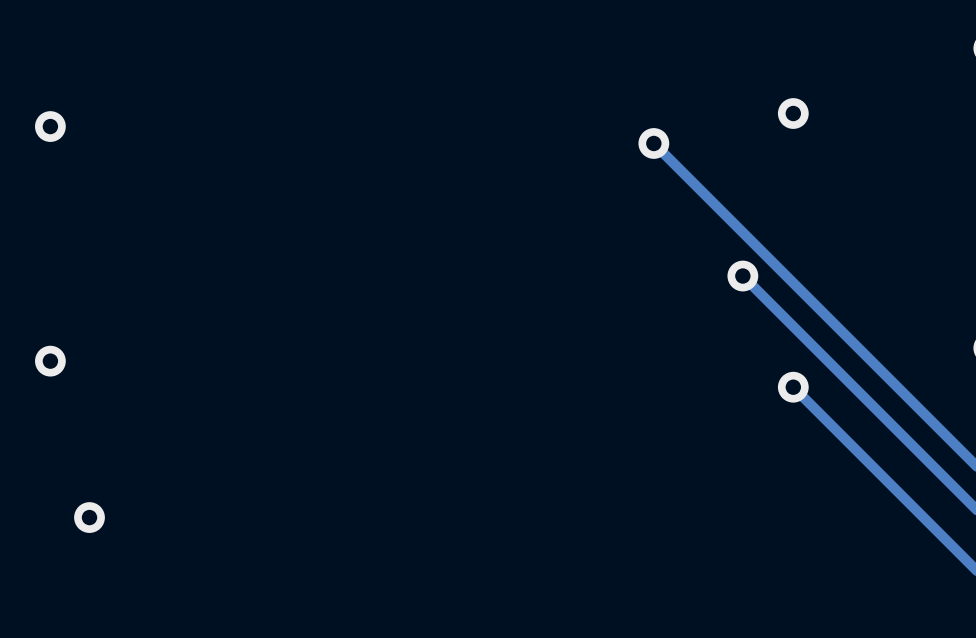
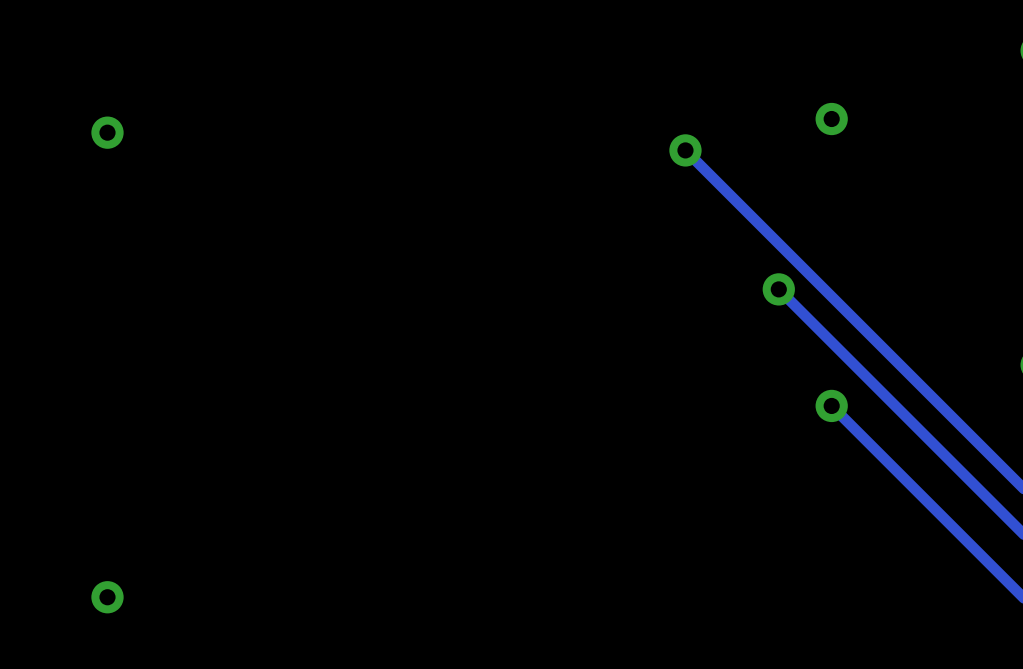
via position: (50, 126) -> (107, 132)
via: (50, 361) -> none
via position: (89, 517) -> (107, 597)

